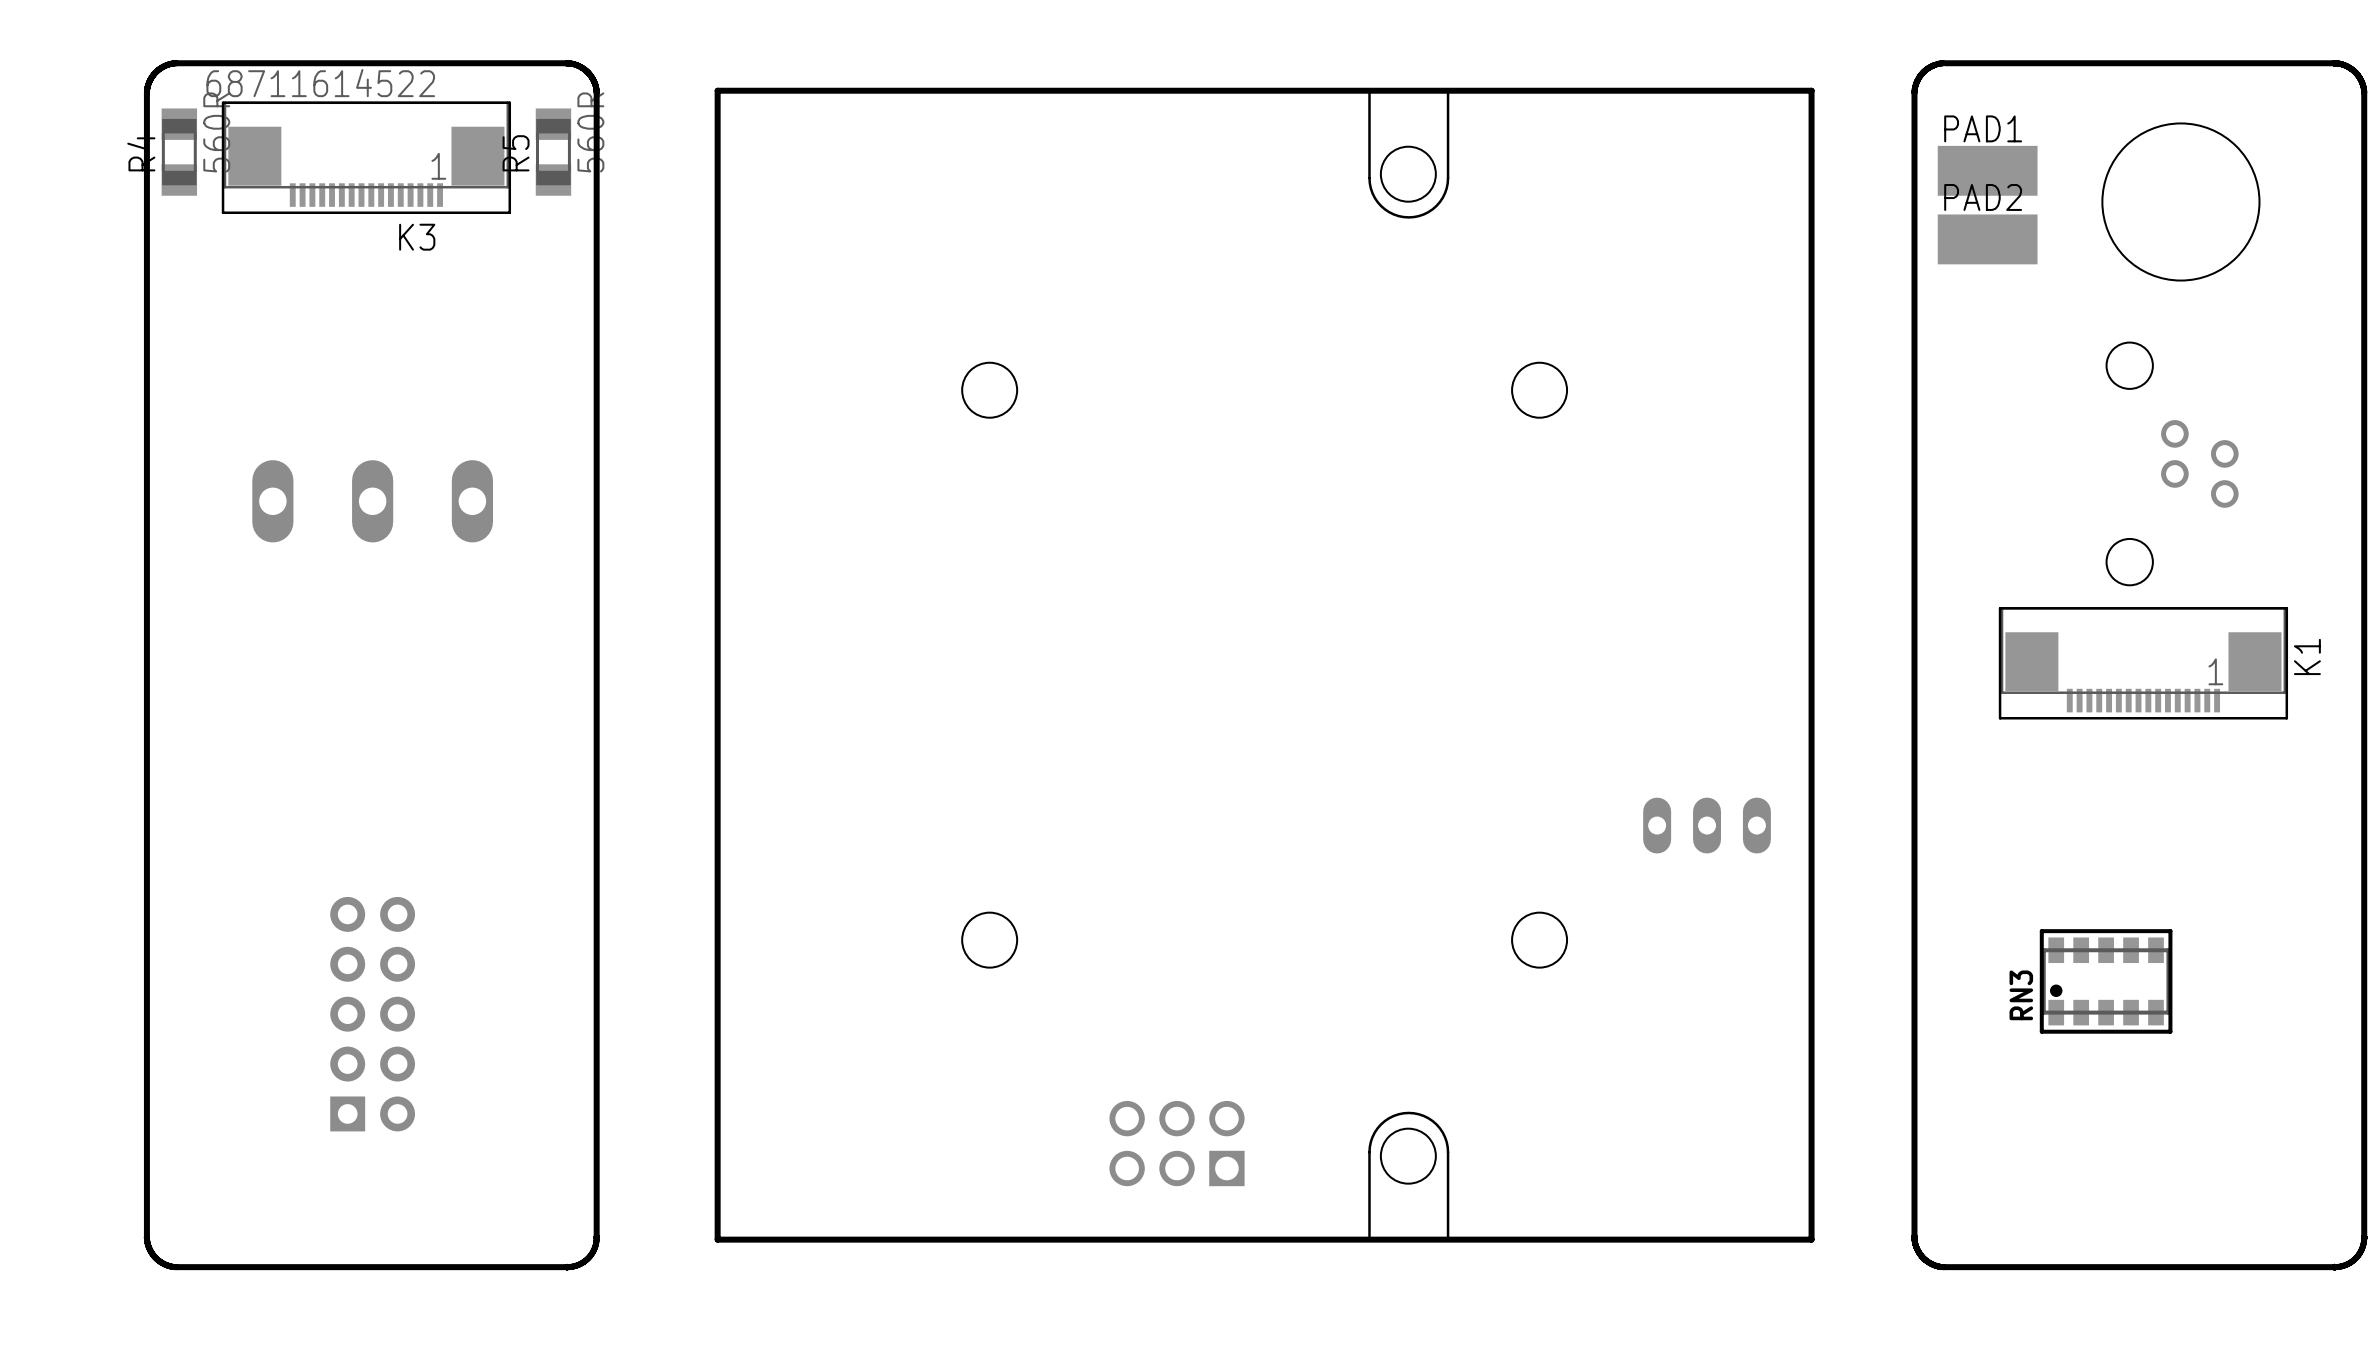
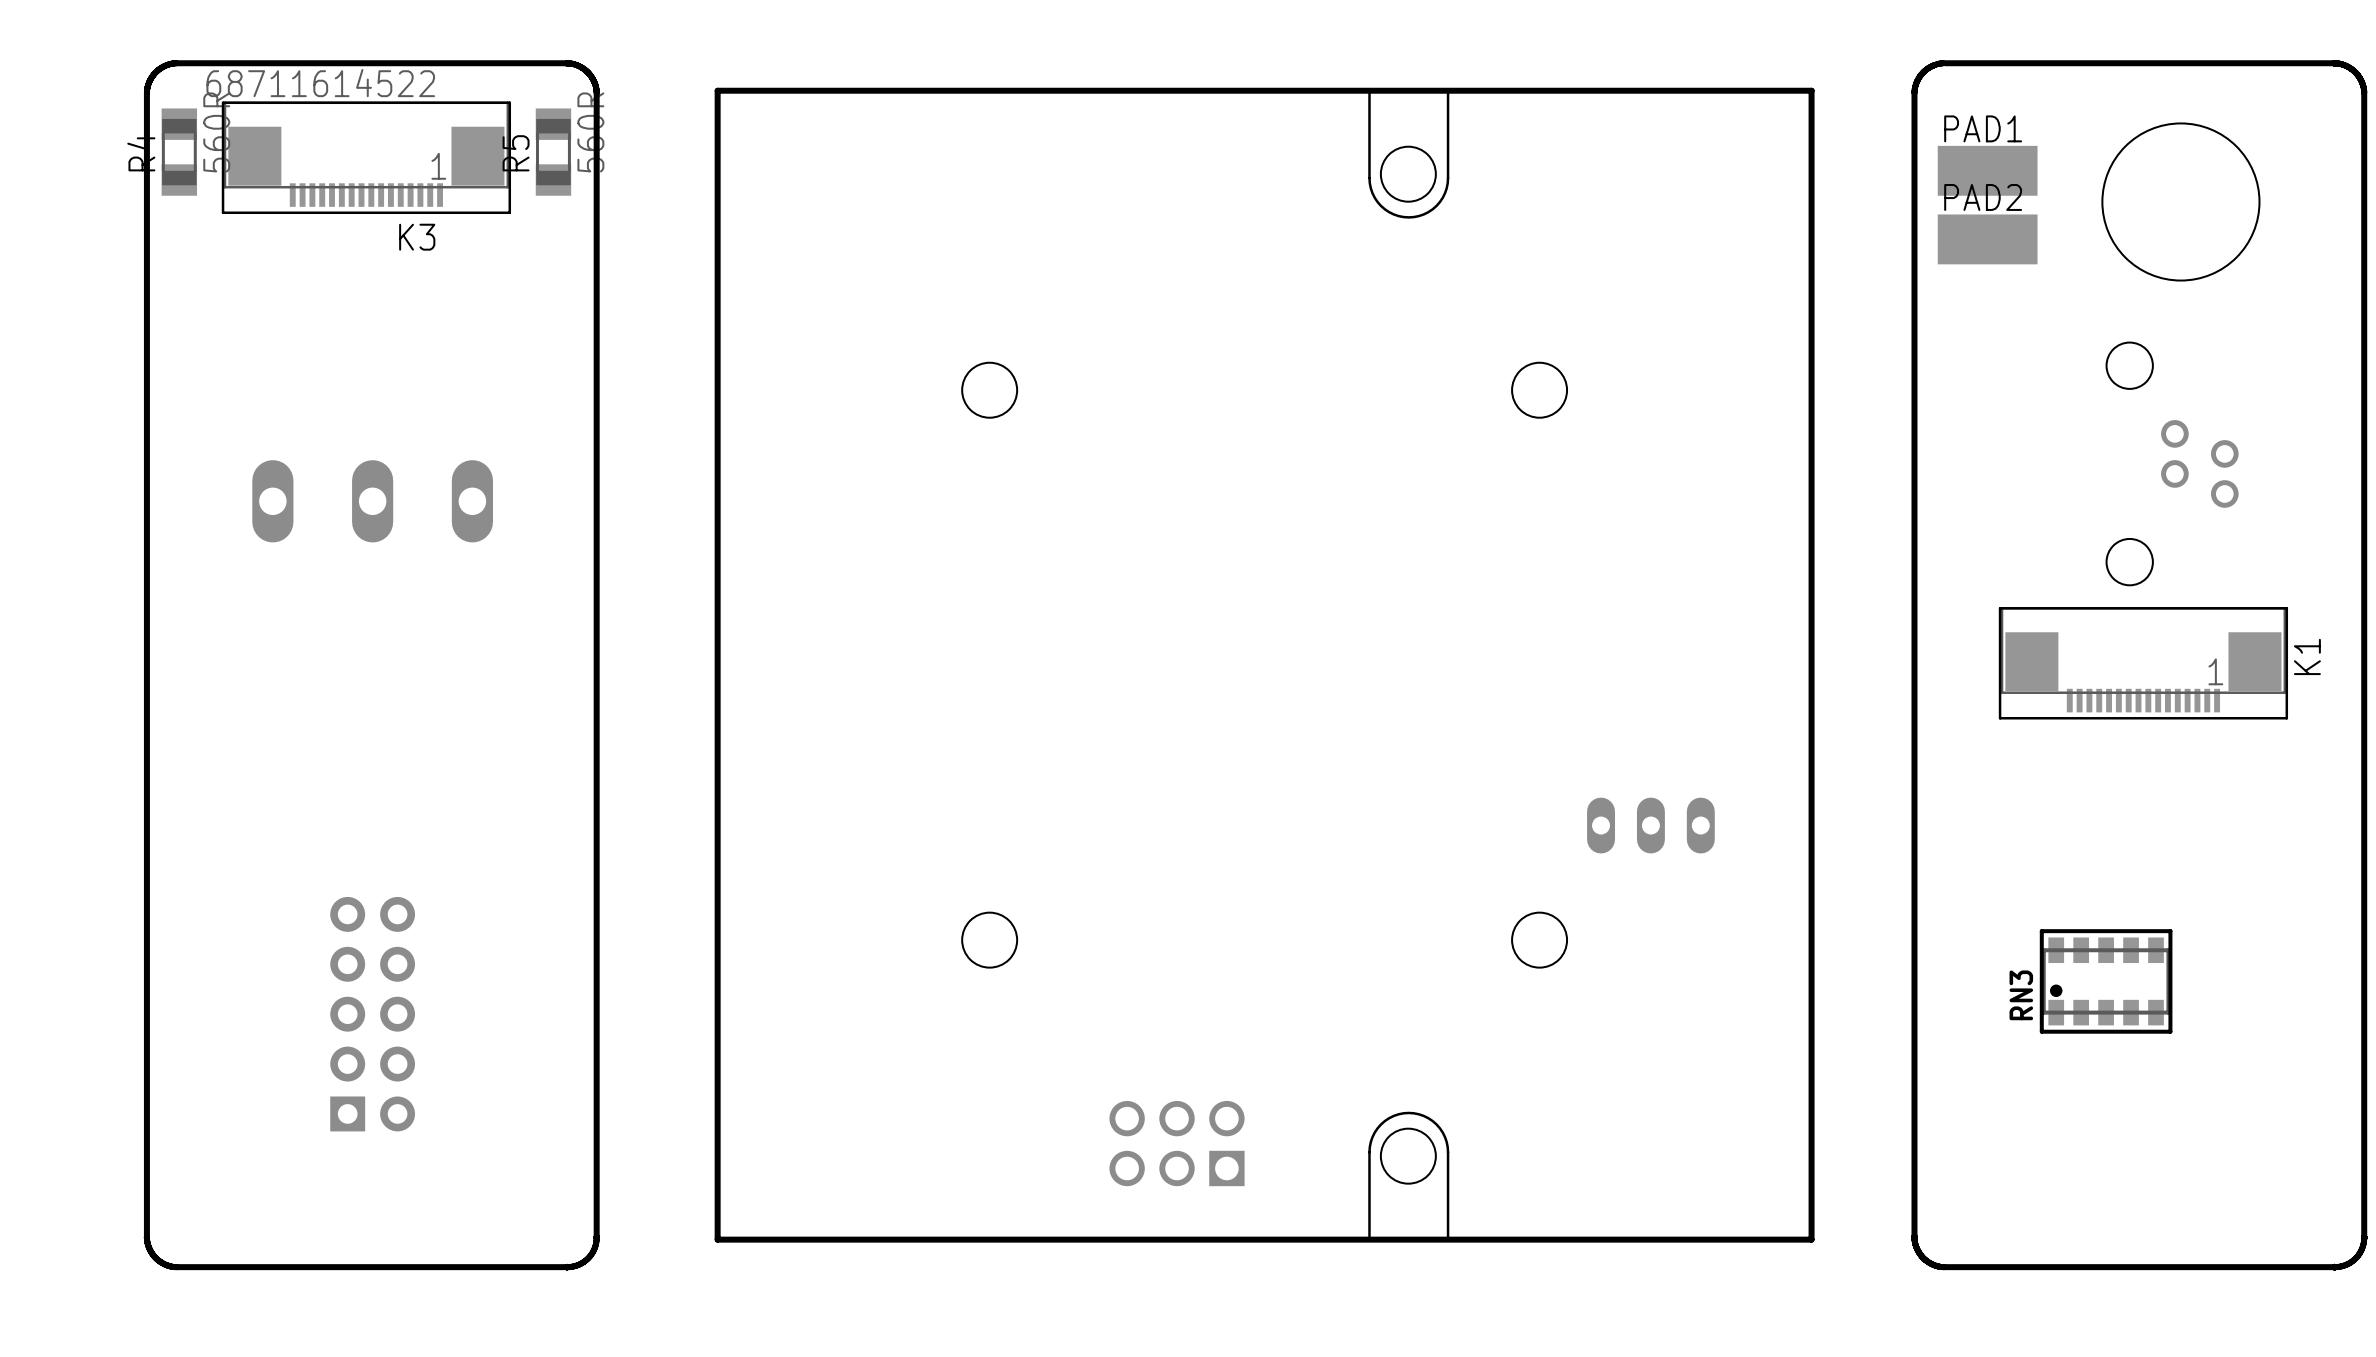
part position: (1707, 825) -> (1650, 825)

